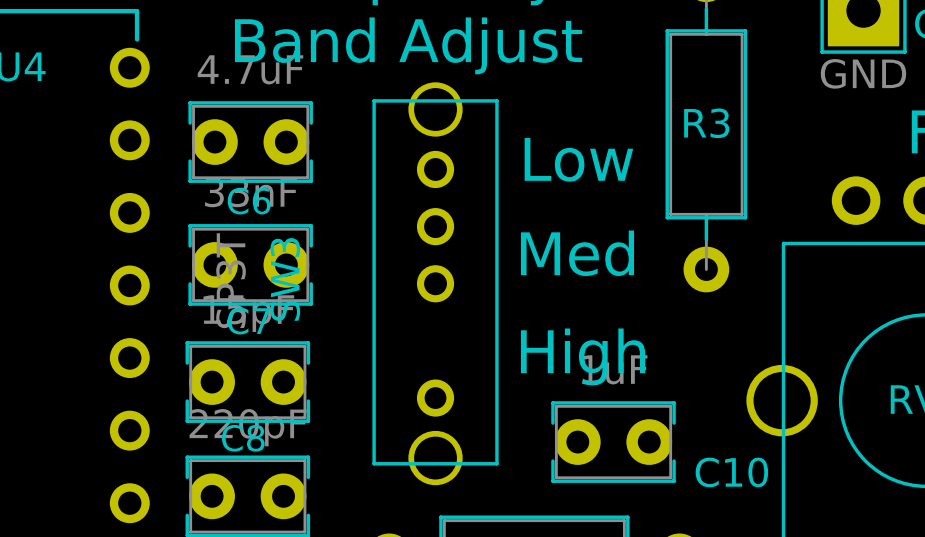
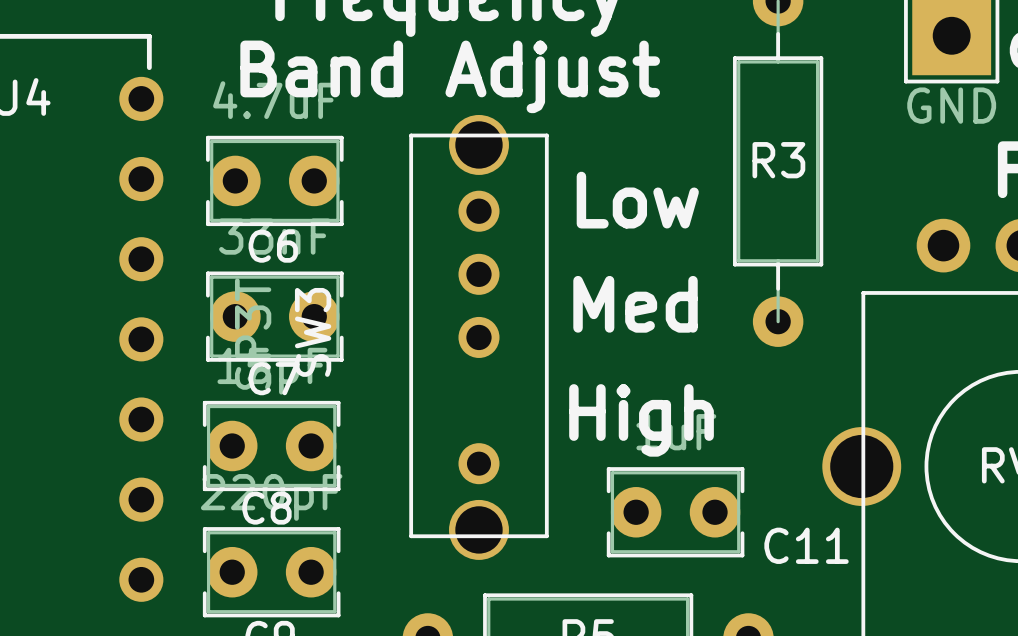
C10 name: C10 (731, 472) -> C11 (806, 545)

